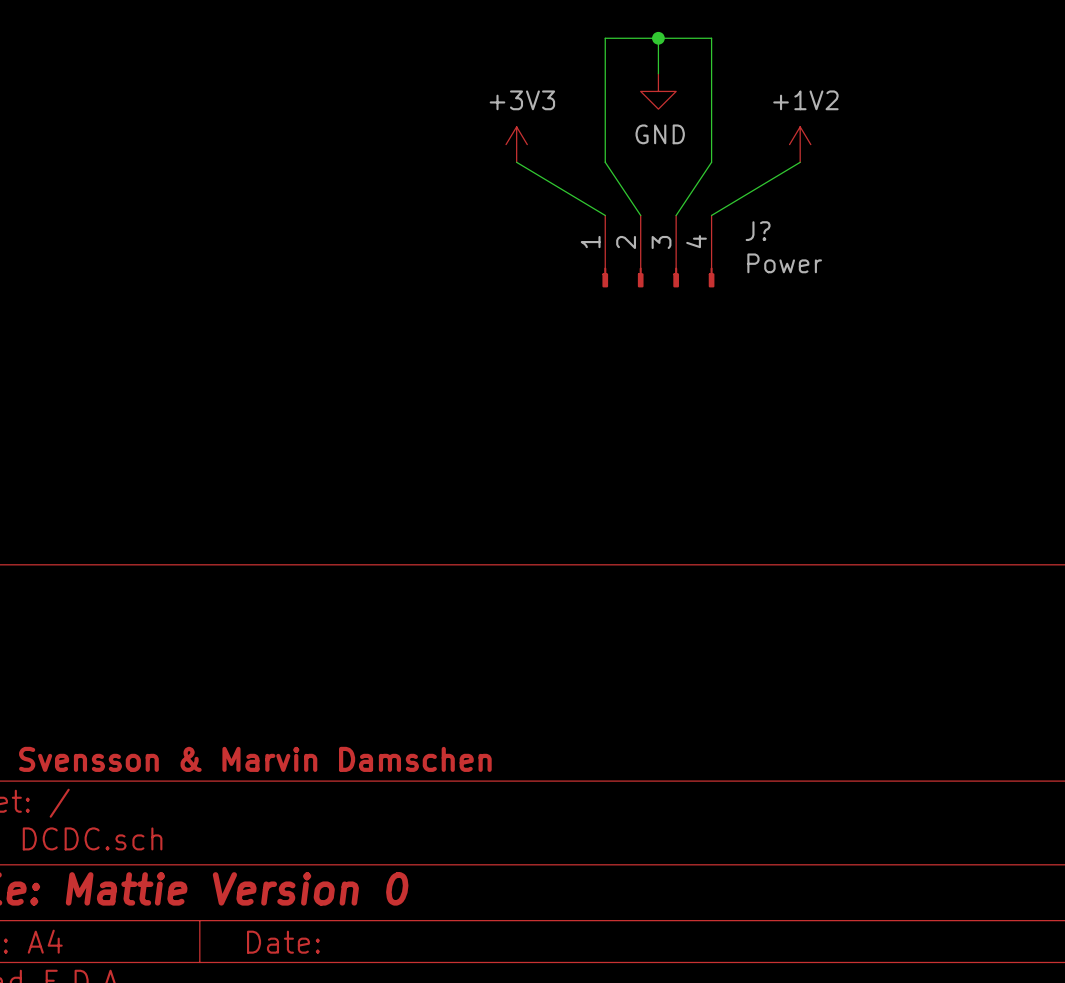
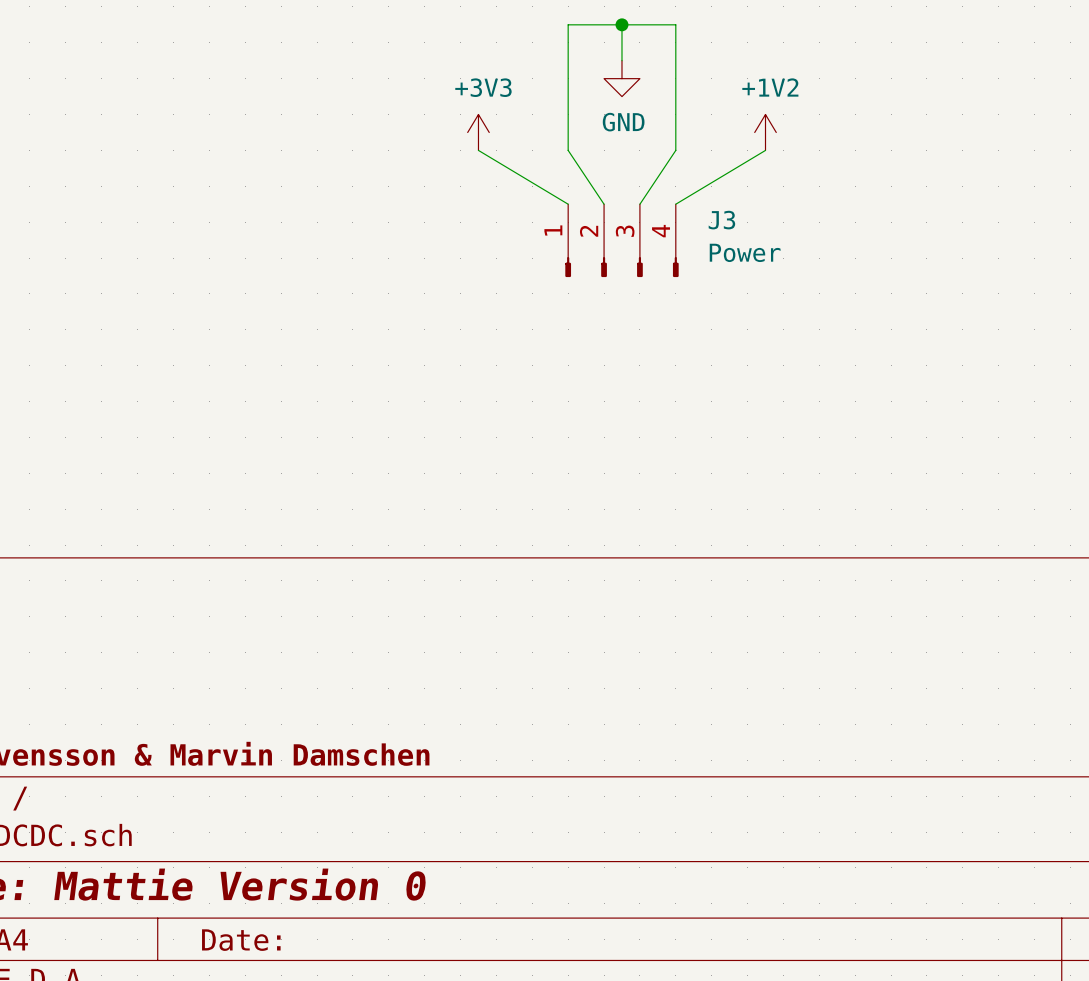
J? name: J? (758, 231) -> J3 (721, 220)

